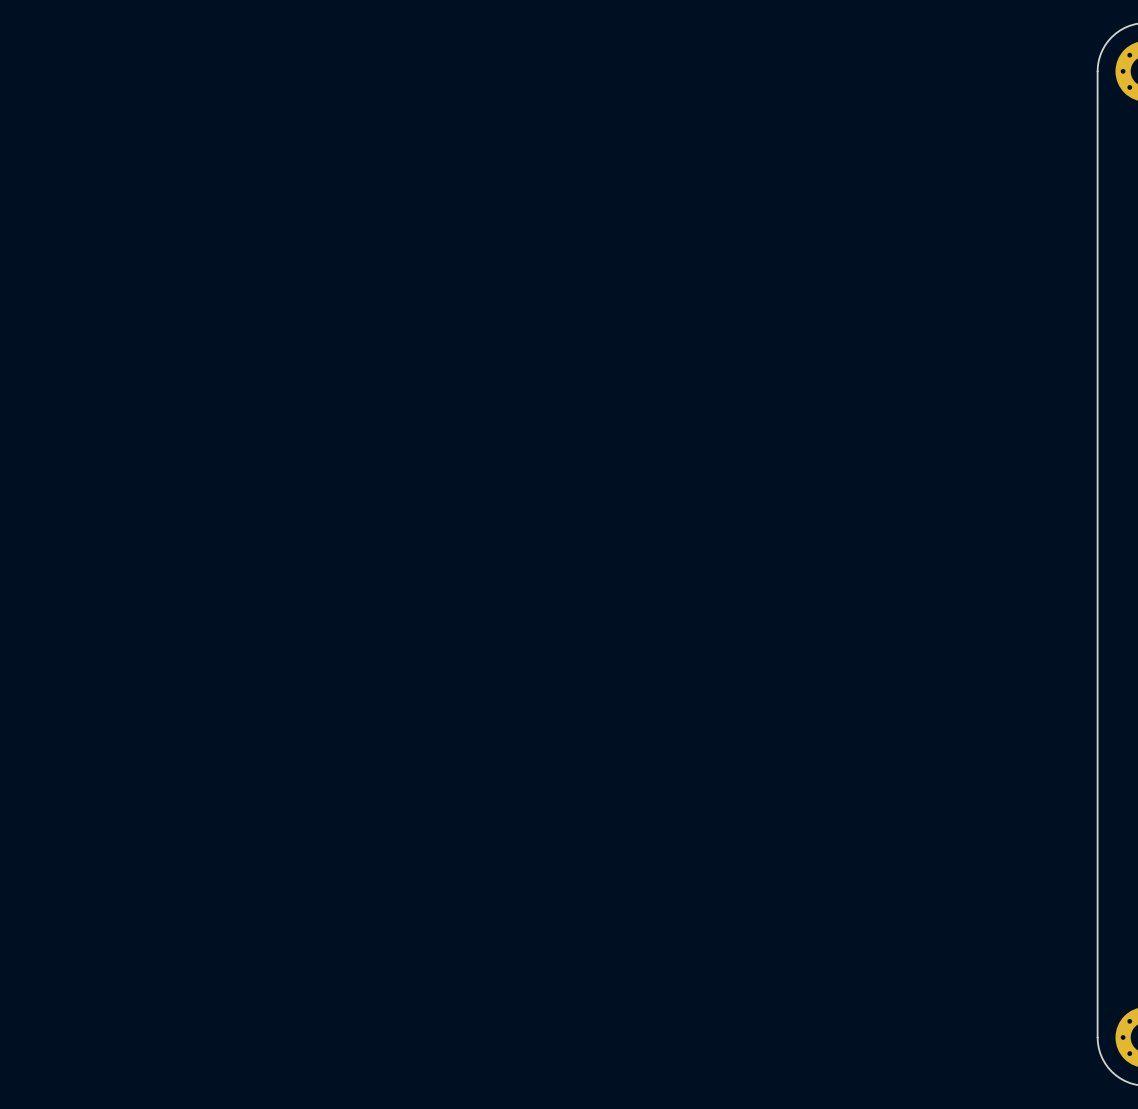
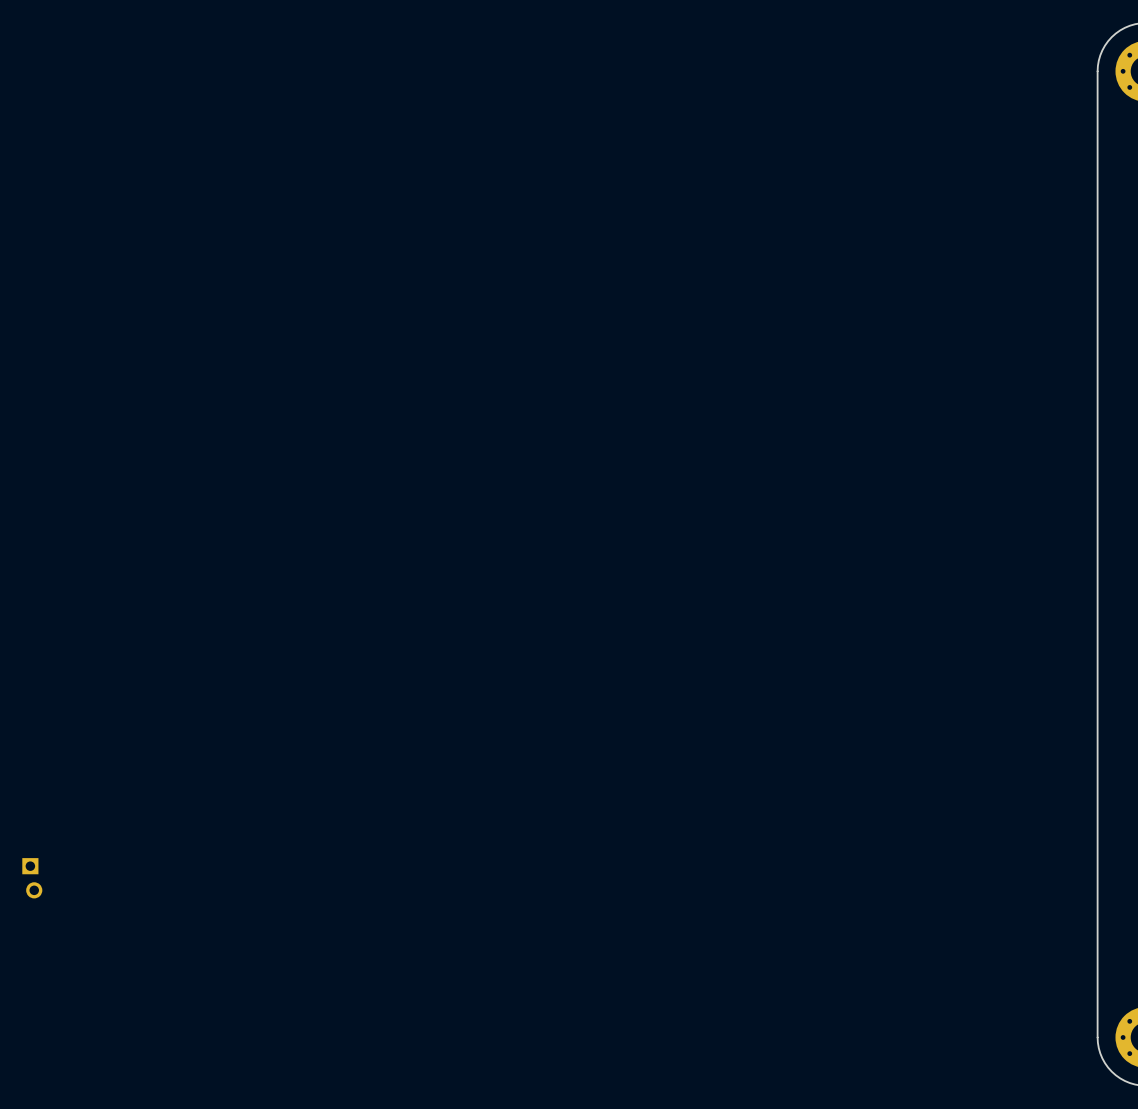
part: none -> (32, 878)

